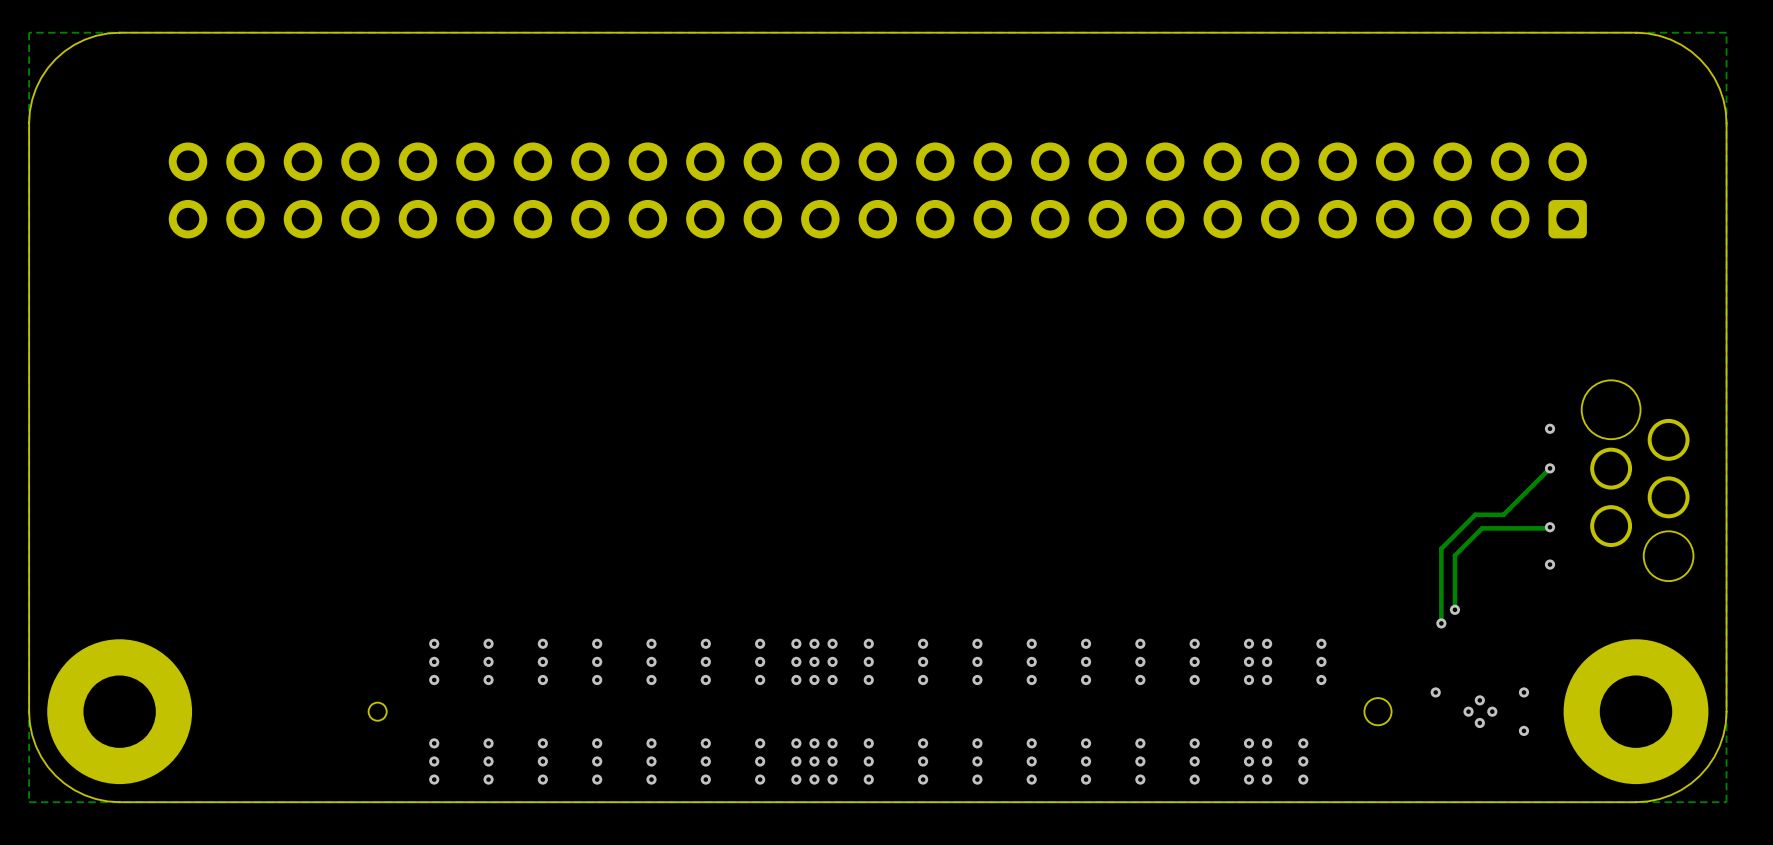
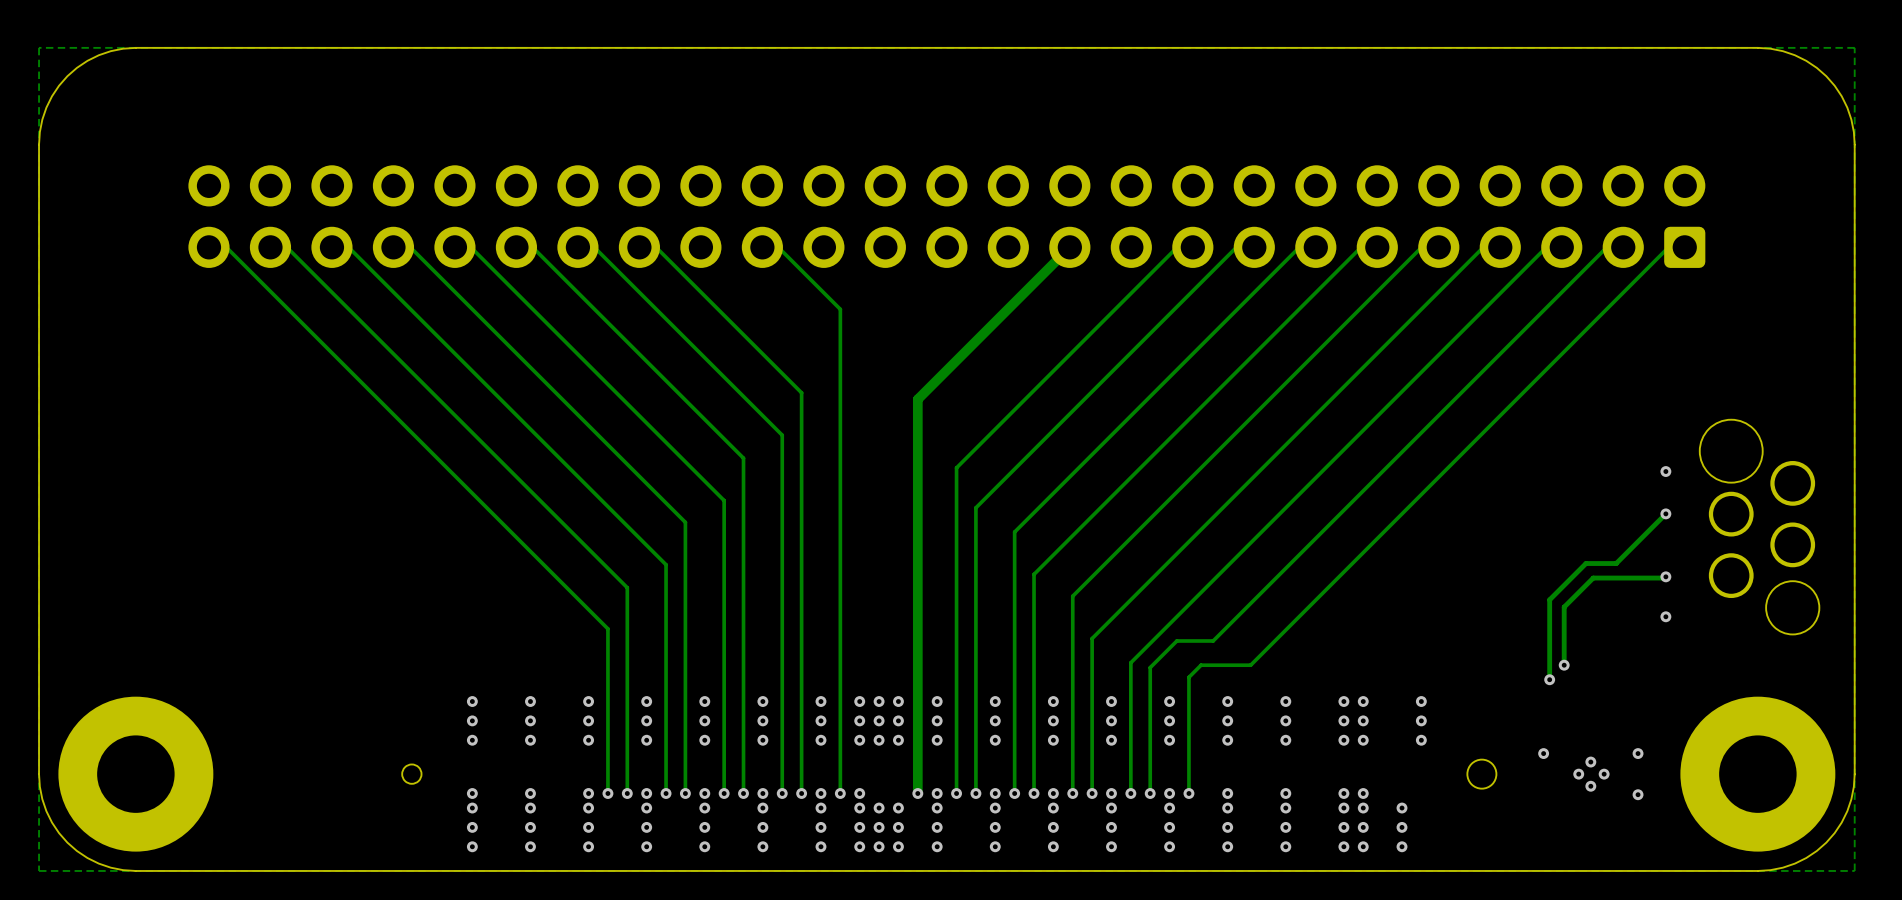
track: none -> (208, 247) (226, 247) (607, 628) (607, 793)
track: none -> (270, 247) (286, 247) (627, 587) (627, 793)
track: none -> (331, 247) (348, 247) (666, 564) (666, 793)
track: none -> (393, 247) (410, 247) (685, 522) (685, 793)
track: none -> (454, 247) (470, 247) (724, 500) (724, 793)
track: none -> (516, 247) (532, 247) (743, 458) (743, 793)
track: none -> (577, 247) (594, 247) (782, 435) (782, 793)
track: none -> (639, 247) (656, 247) (801, 392) (801, 793)
track: none -> (762, 247) (778, 247) (840, 309) (840, 793)
track: none -> (1069, 247) (917, 399) (917, 793)
track: none -> (1192, 247) (1177, 247) (956, 467) (956, 793)
track: none -> (1254, 247) (1236, 247) (975, 507) (975, 793)
track: none -> (1315, 247) (1299, 247) (1014, 532) (1014, 793)
track: none -> (1377, 247) (1361, 247) (1034, 574) (1034, 793)
track: none -> (1438, 247) (1421, 247) (1072, 596) (1072, 793)
track: none -> (1500, 247) (1483, 247) (1092, 638) (1092, 793)
track: none -> (1561, 247) (1546, 247) (1130, 662) (1130, 793)
track: none -> (1623, 247) (1606, 247) (1213, 640) (1176, 640) (1150, 667) (1150, 793)
track: none -> (1684, 247) (1668, 247) (1250, 665) (1201, 665) (1188, 677) (1188, 793)
via: none -> (472, 793)
via: none -> (530, 793)
via: none -> (588, 793)
via: none -> (607, 793)
via: none -> (627, 793)
via: none -> (646, 793)
via: none -> (666, 793)
via: none -> (685, 793)
via: none -> (704, 793)
via: none -> (724, 793)
via: none -> (743, 793)
via: none -> (762, 793)
via: none -> (782, 793)
via: none -> (801, 793)
via: none -> (820, 793)
via: none -> (840, 793)
via: none -> (859, 793)
via: none -> (917, 793)
via: none -> (937, 793)
via: none -> (956, 793)
via: none -> (975, 793)
via: none -> (995, 793)
via: none -> (1014, 793)
via: none -> (1034, 793)
via: none -> (1053, 793)
via: none -> (1072, 793)
via: none -> (1092, 793)
via: none -> (1111, 793)
via: none -> (1130, 793)
via: none -> (1150, 793)
via: none -> (1169, 793)
via: none -> (1188, 793)
via: none -> (1227, 793)
via: none -> (1285, 793)
via: none -> (1343, 793)
via: none -> (1363, 793)

